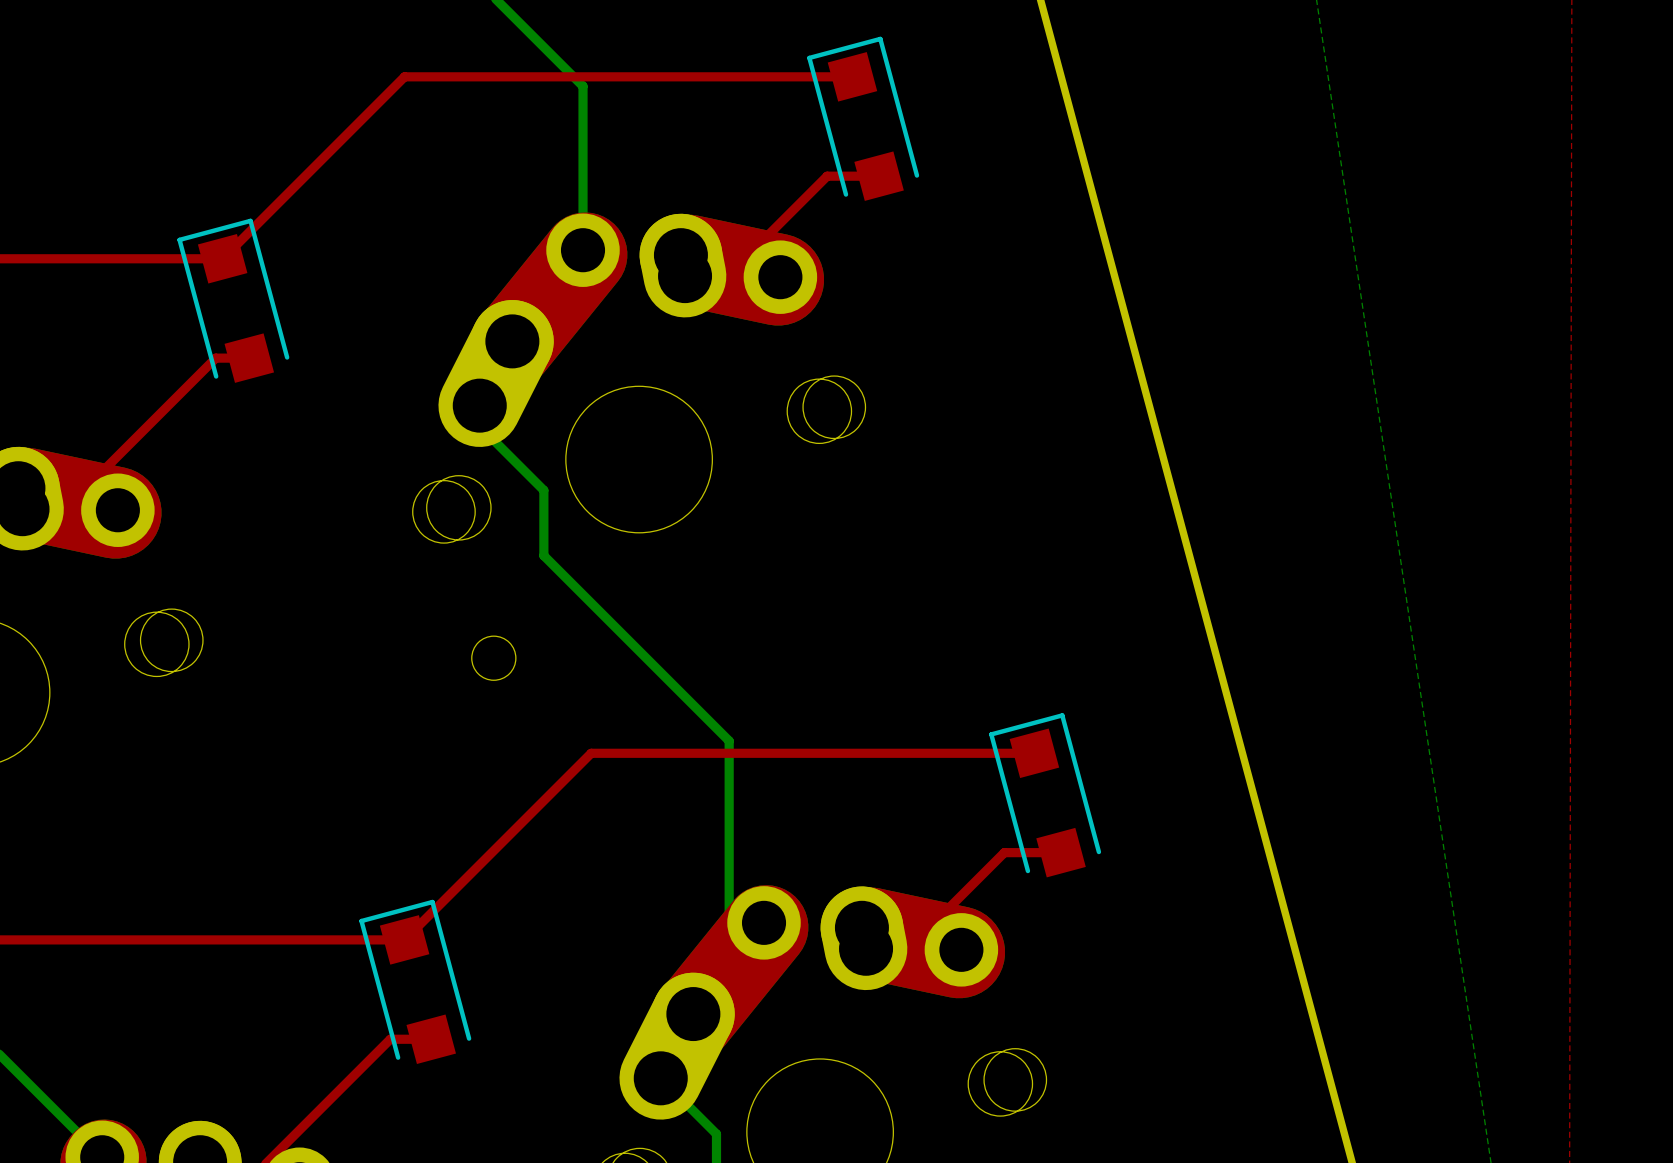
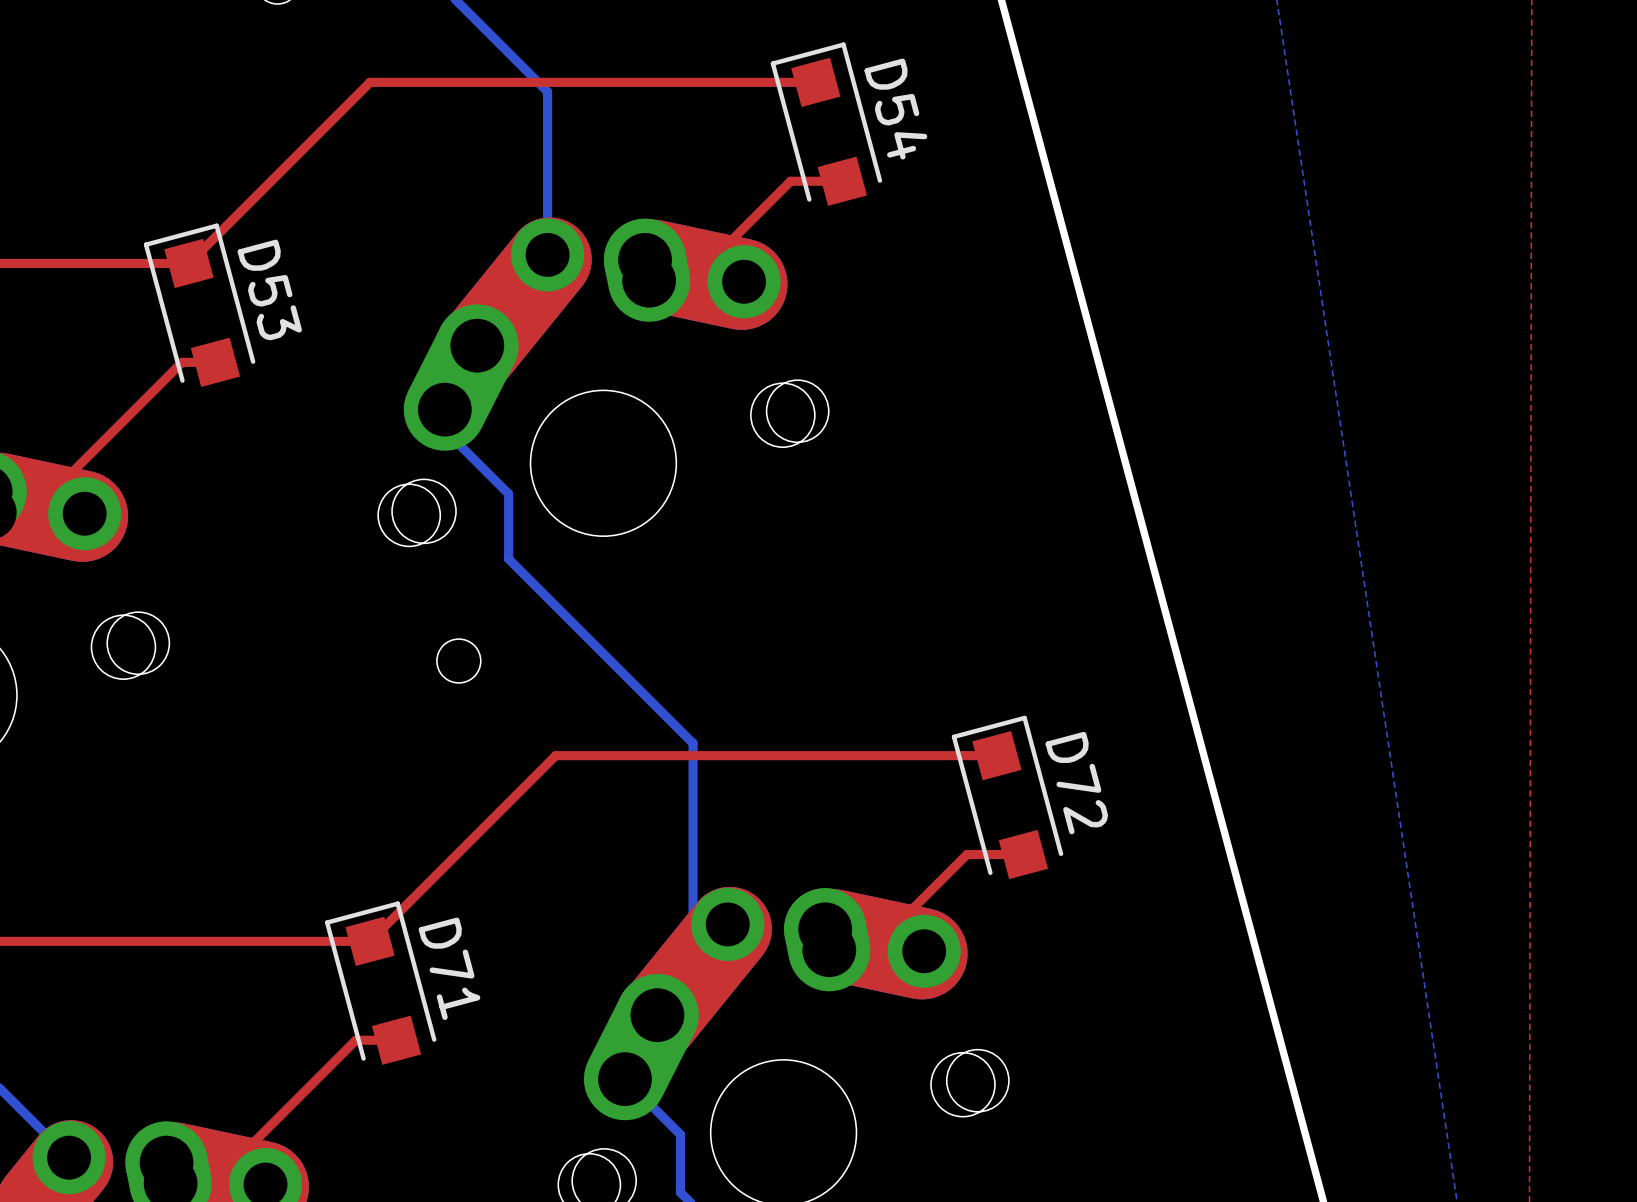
D54 name: none -> D54 (895, 109)
D53 name: none -> D53 (269, 289)
D72 name: none -> D72 (1076, 783)
D71 name: none -> D71 (449, 968)

